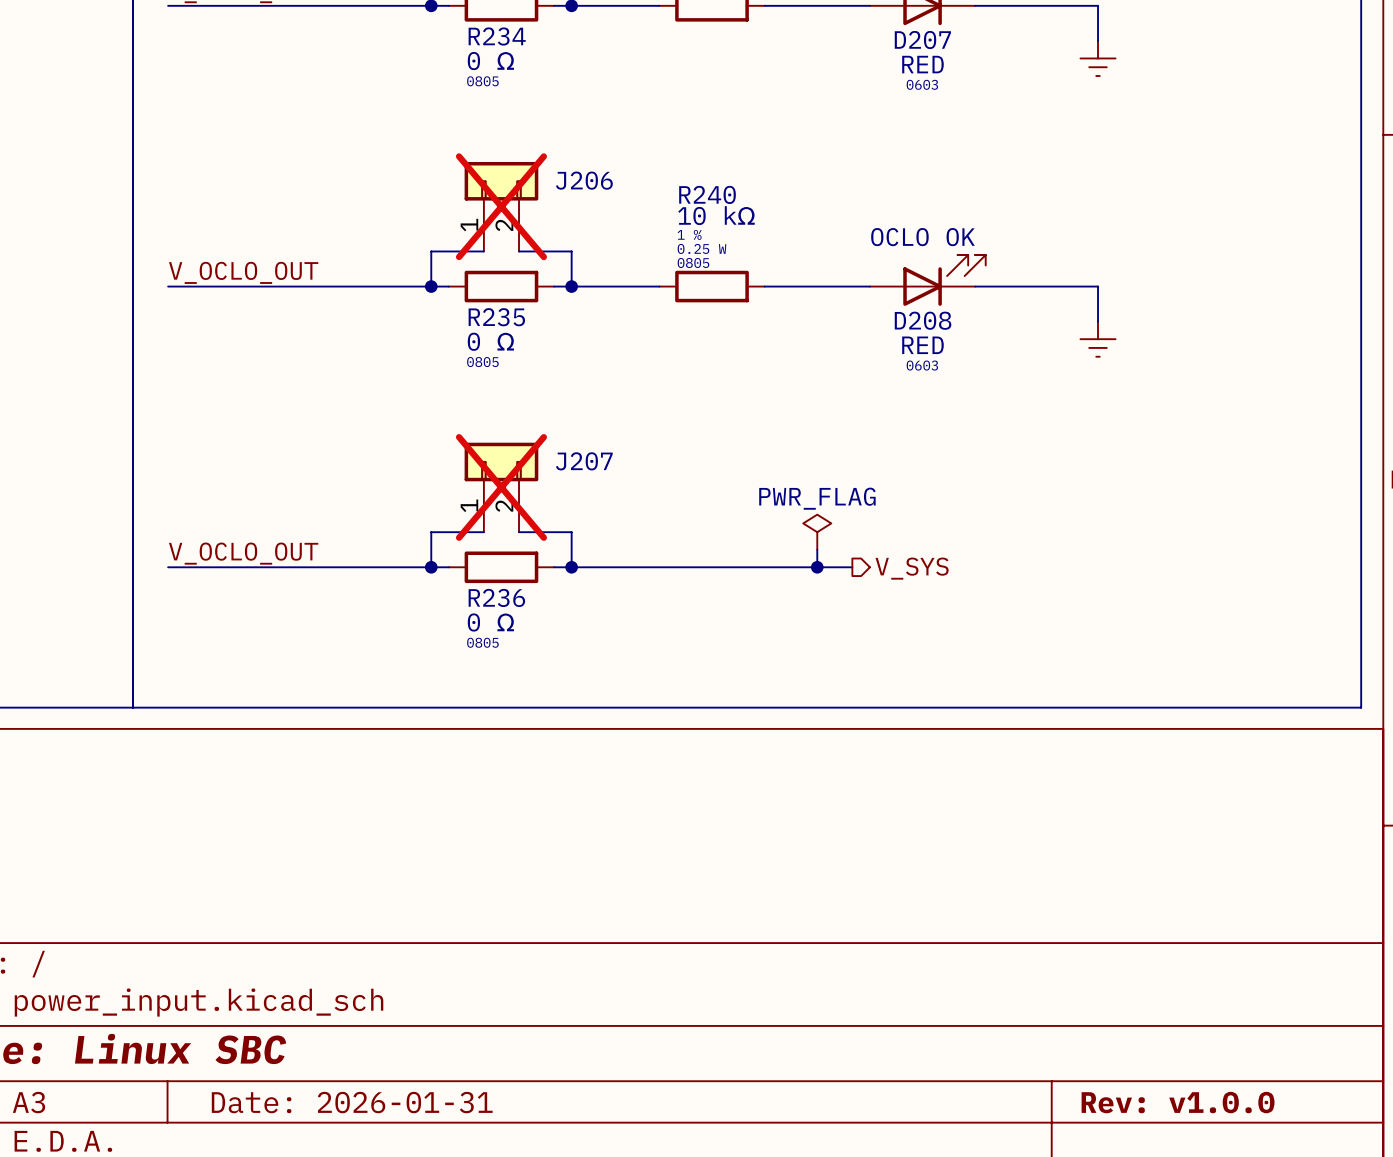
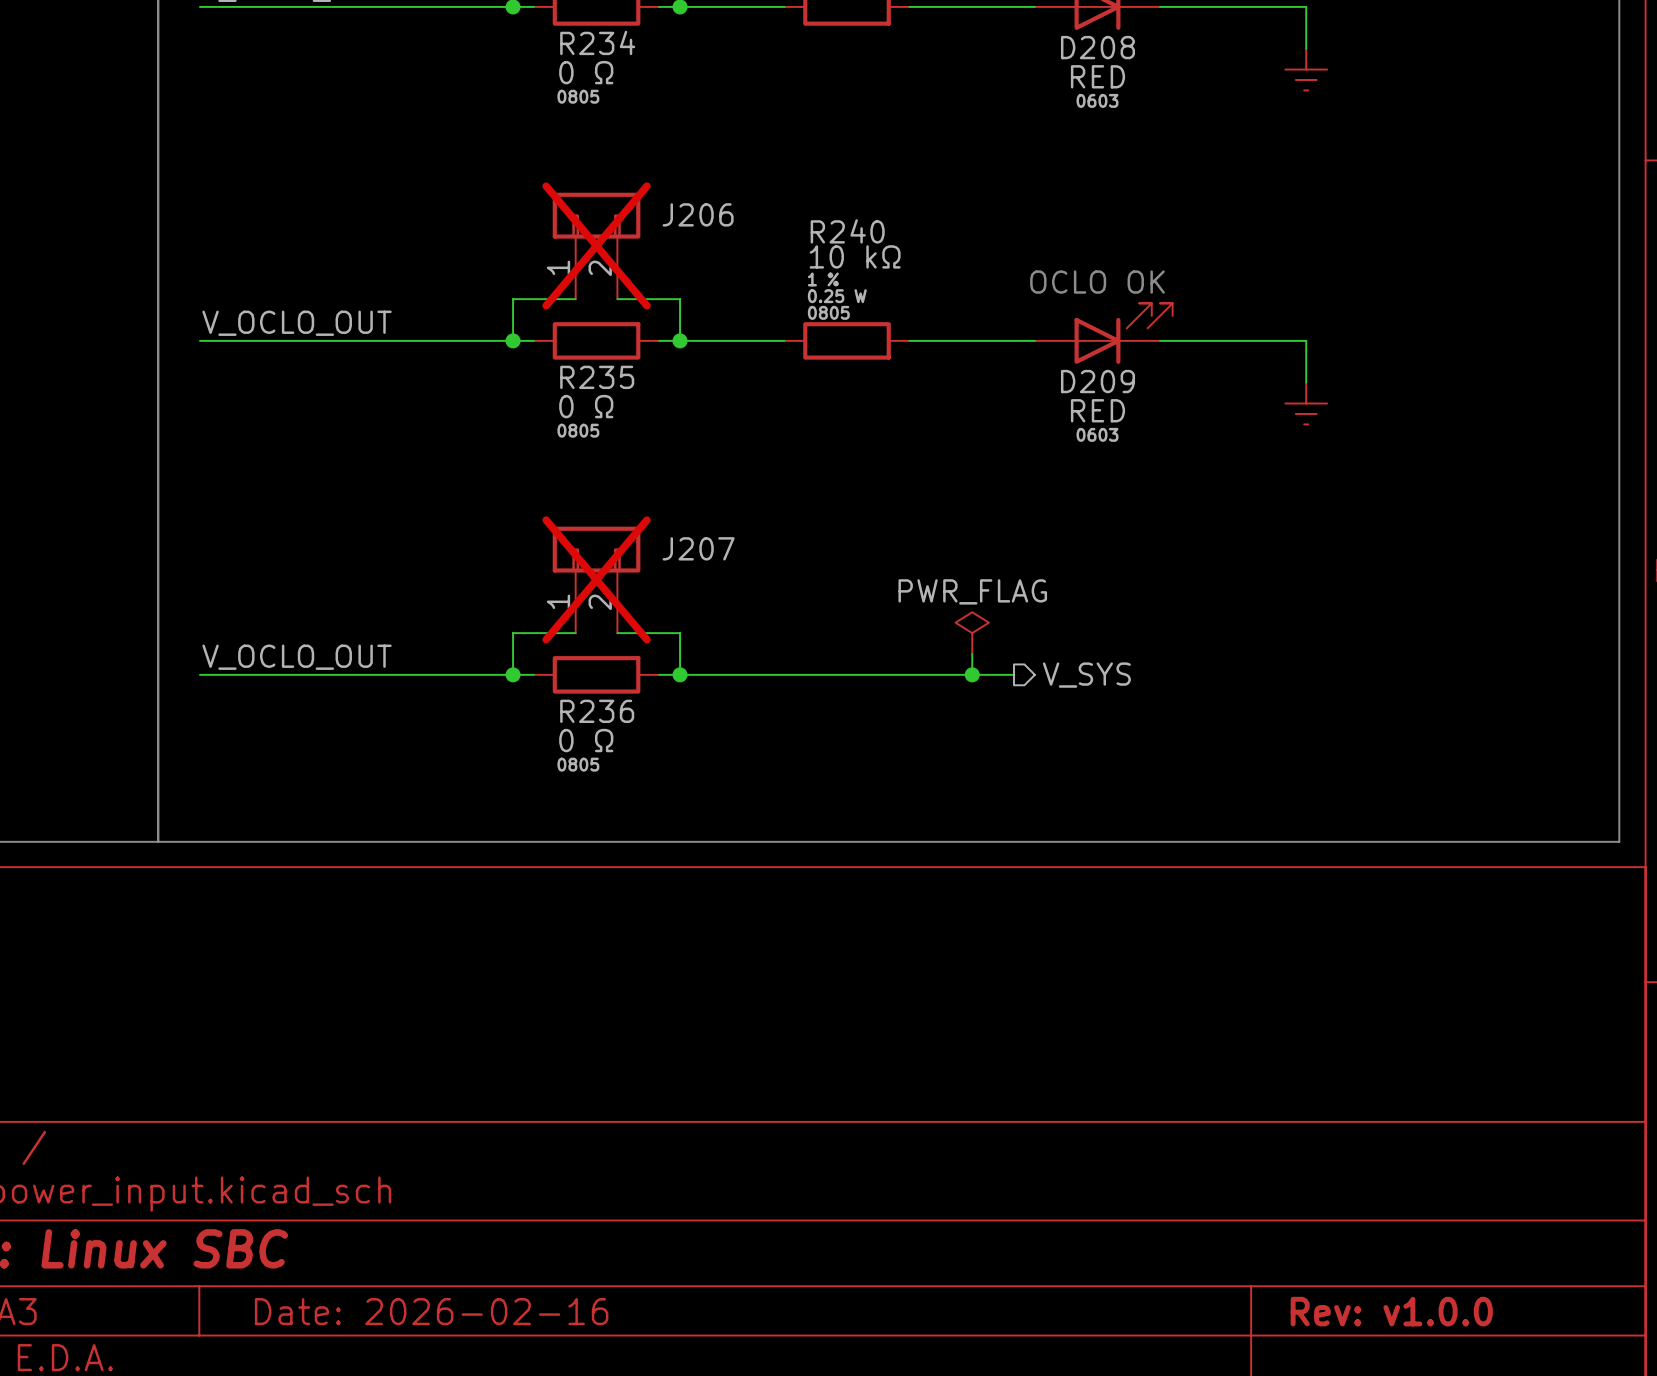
D207 name: D207 (922, 40) -> D208 (1097, 47)
D208 name: D208 (923, 320) -> D209 (1097, 381)
title block: Date: 2026-01-31 (352, 1102) -> Date: 2026-02-16 (431, 1311)

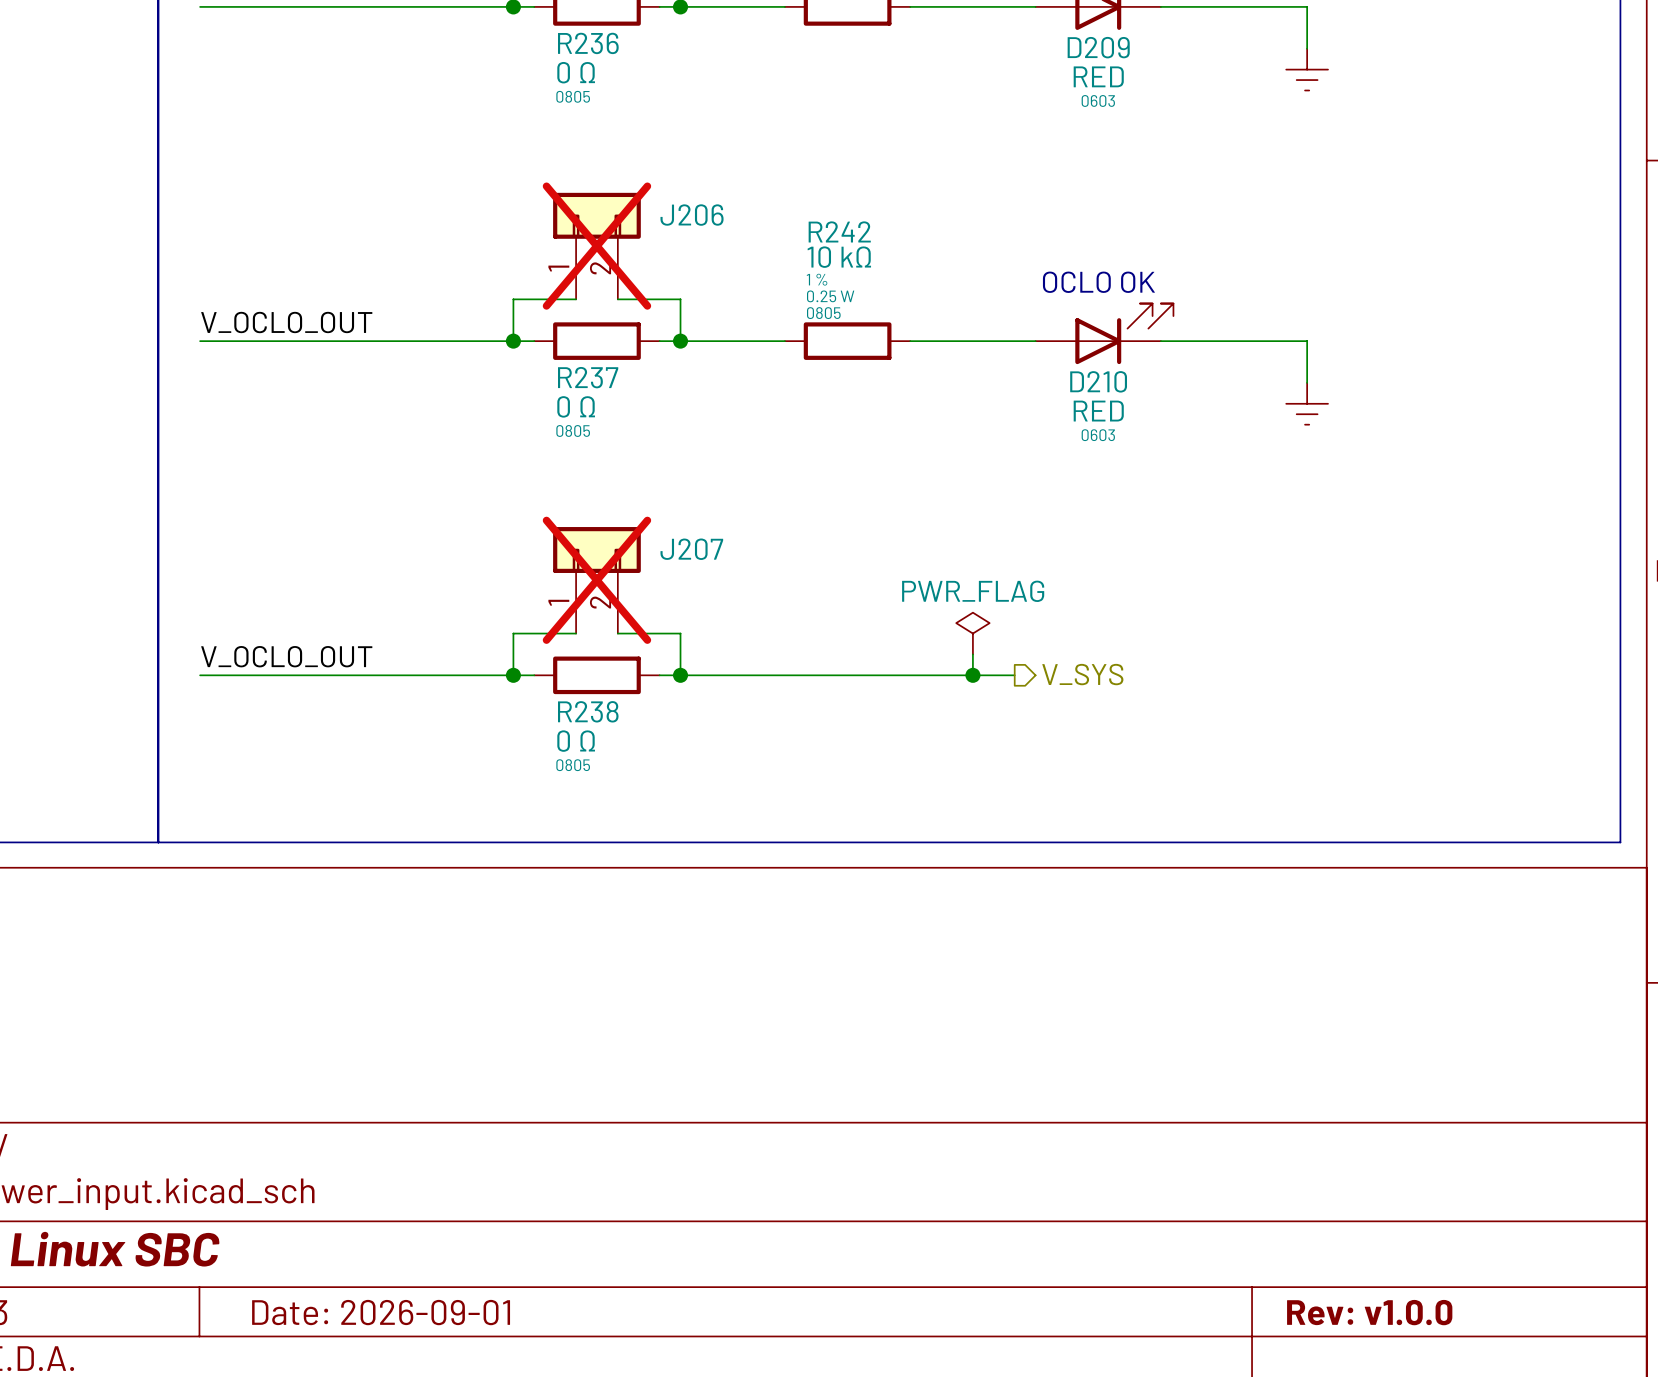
R234 name: R234 (597, 42) -> R236 (588, 43)
D208 name: D208 (1097, 47) -> D209 (1098, 47)
R240 name: R240 (847, 231) -> R242 (839, 231)
R235 name: R235 (597, 377) -> R237 (588, 377)
D209 name: D209 (1097, 381) -> D210 (1098, 381)
R236 name: R236 (597, 711) -> R238 (588, 711)
title block: Date: 2026-02-16 (431, 1311) -> Date: 2026-09-01 (381, 1312)

